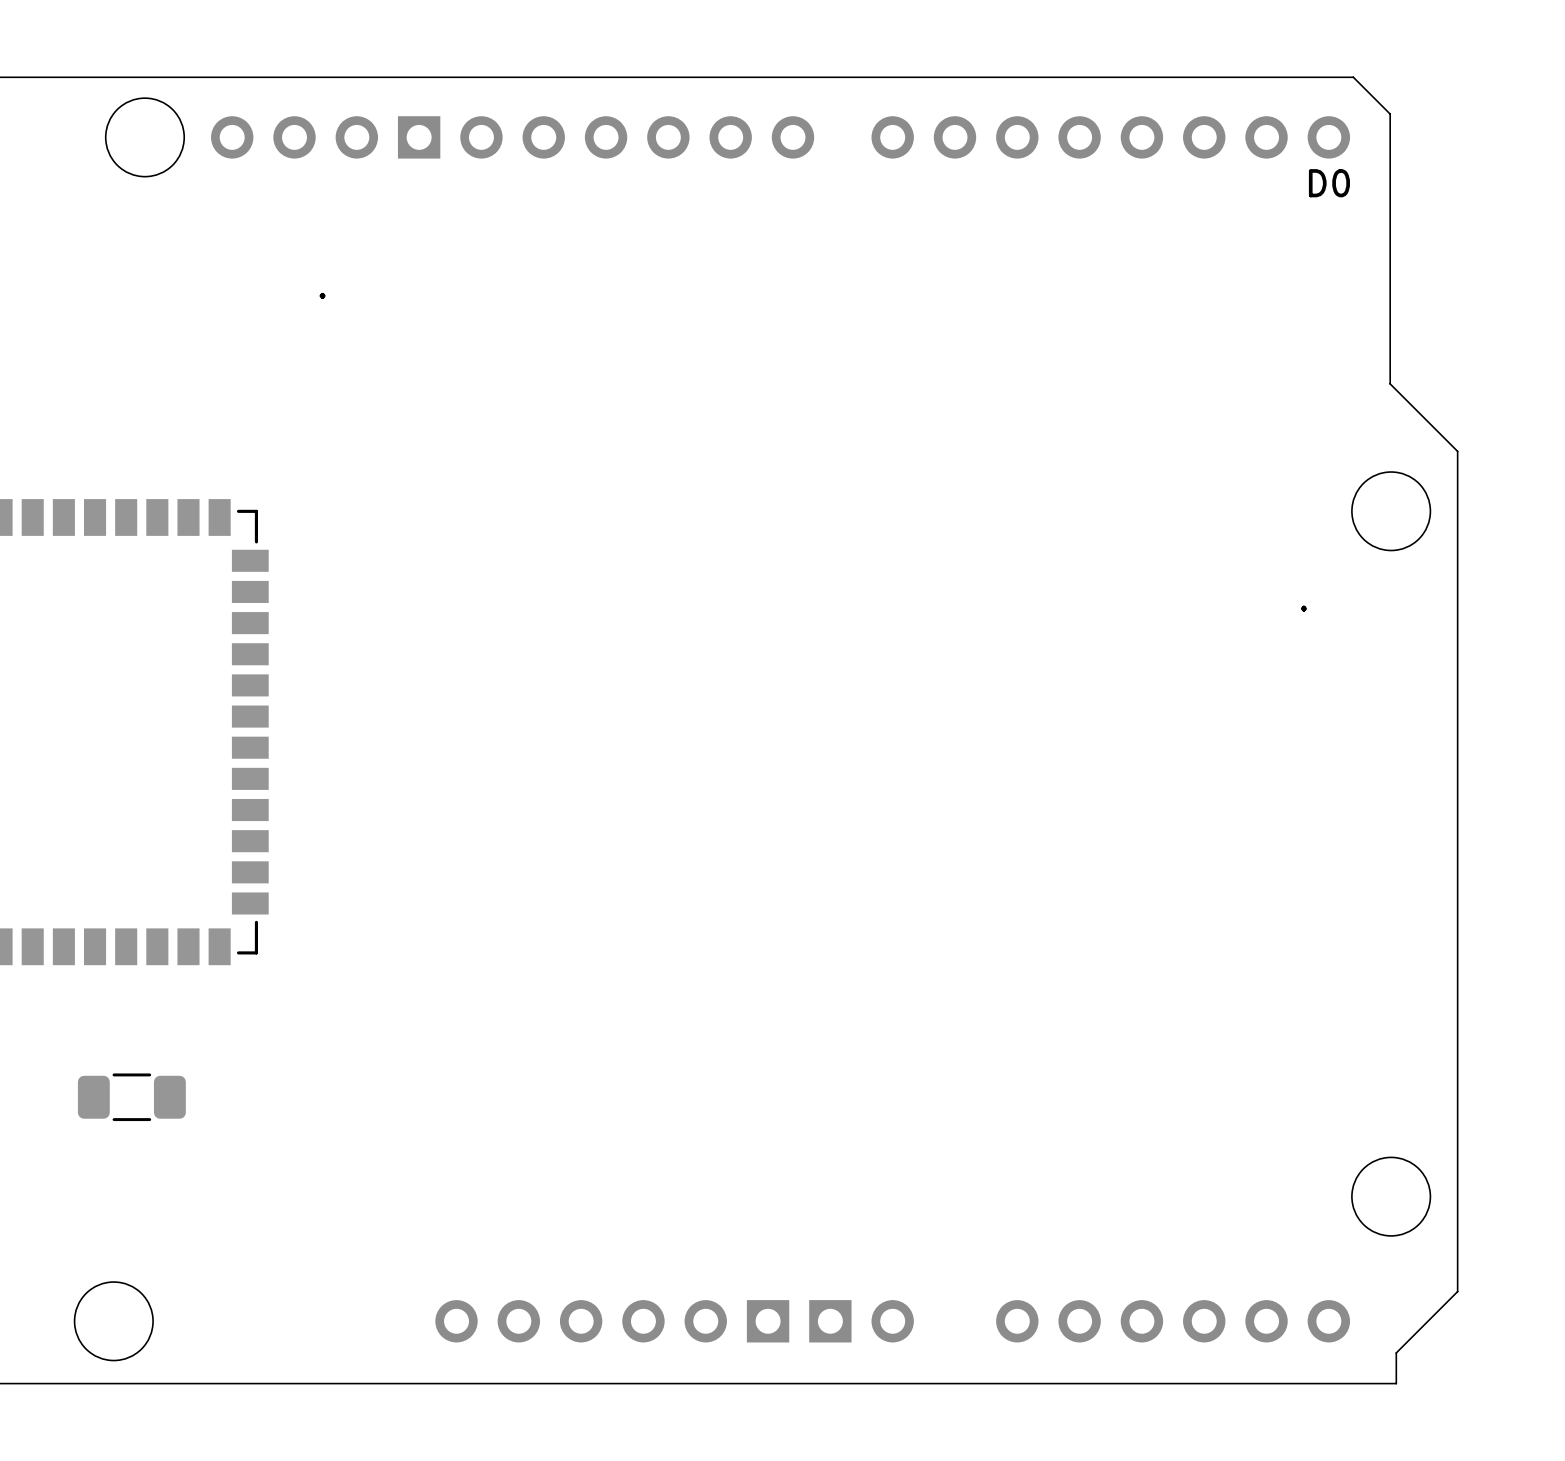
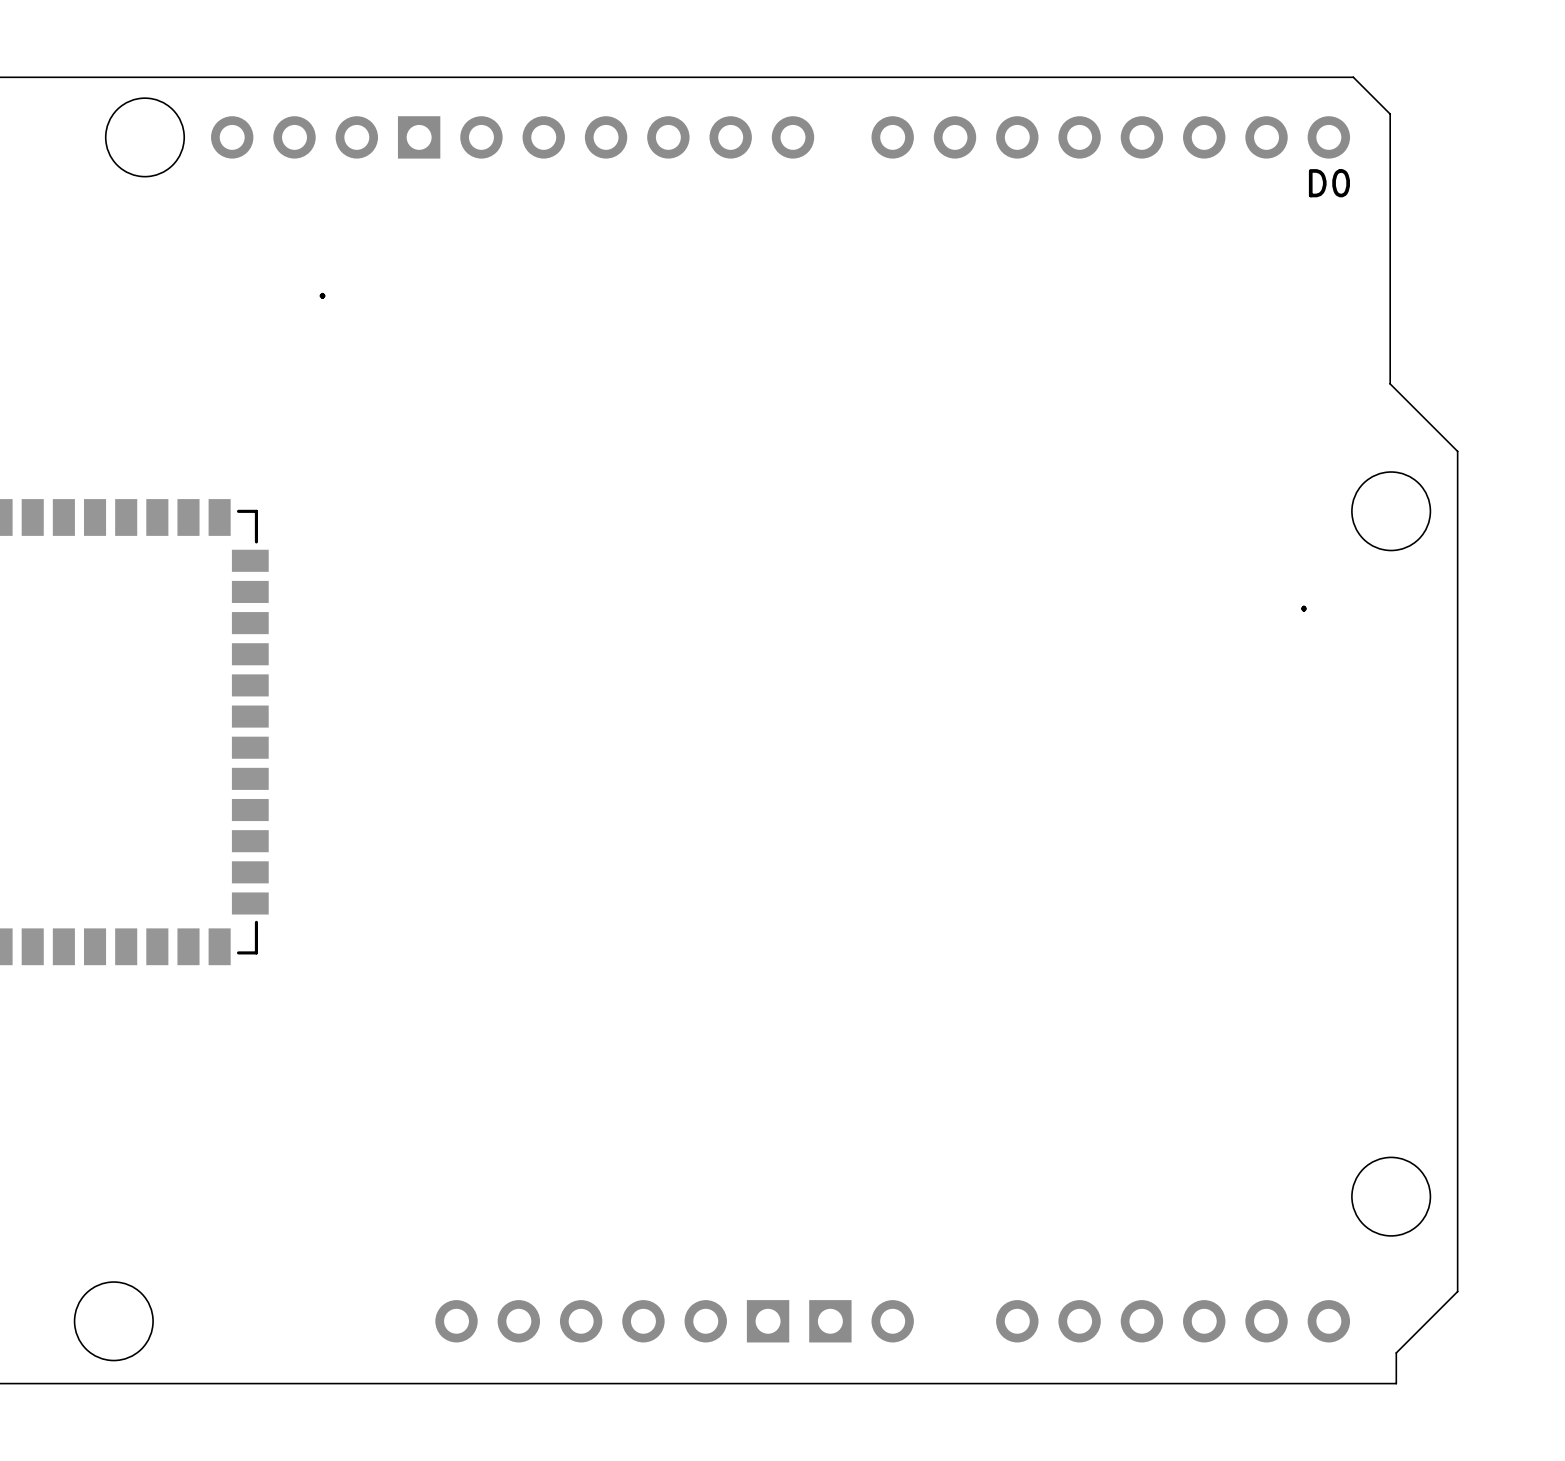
part: (131, 1097) -> none

